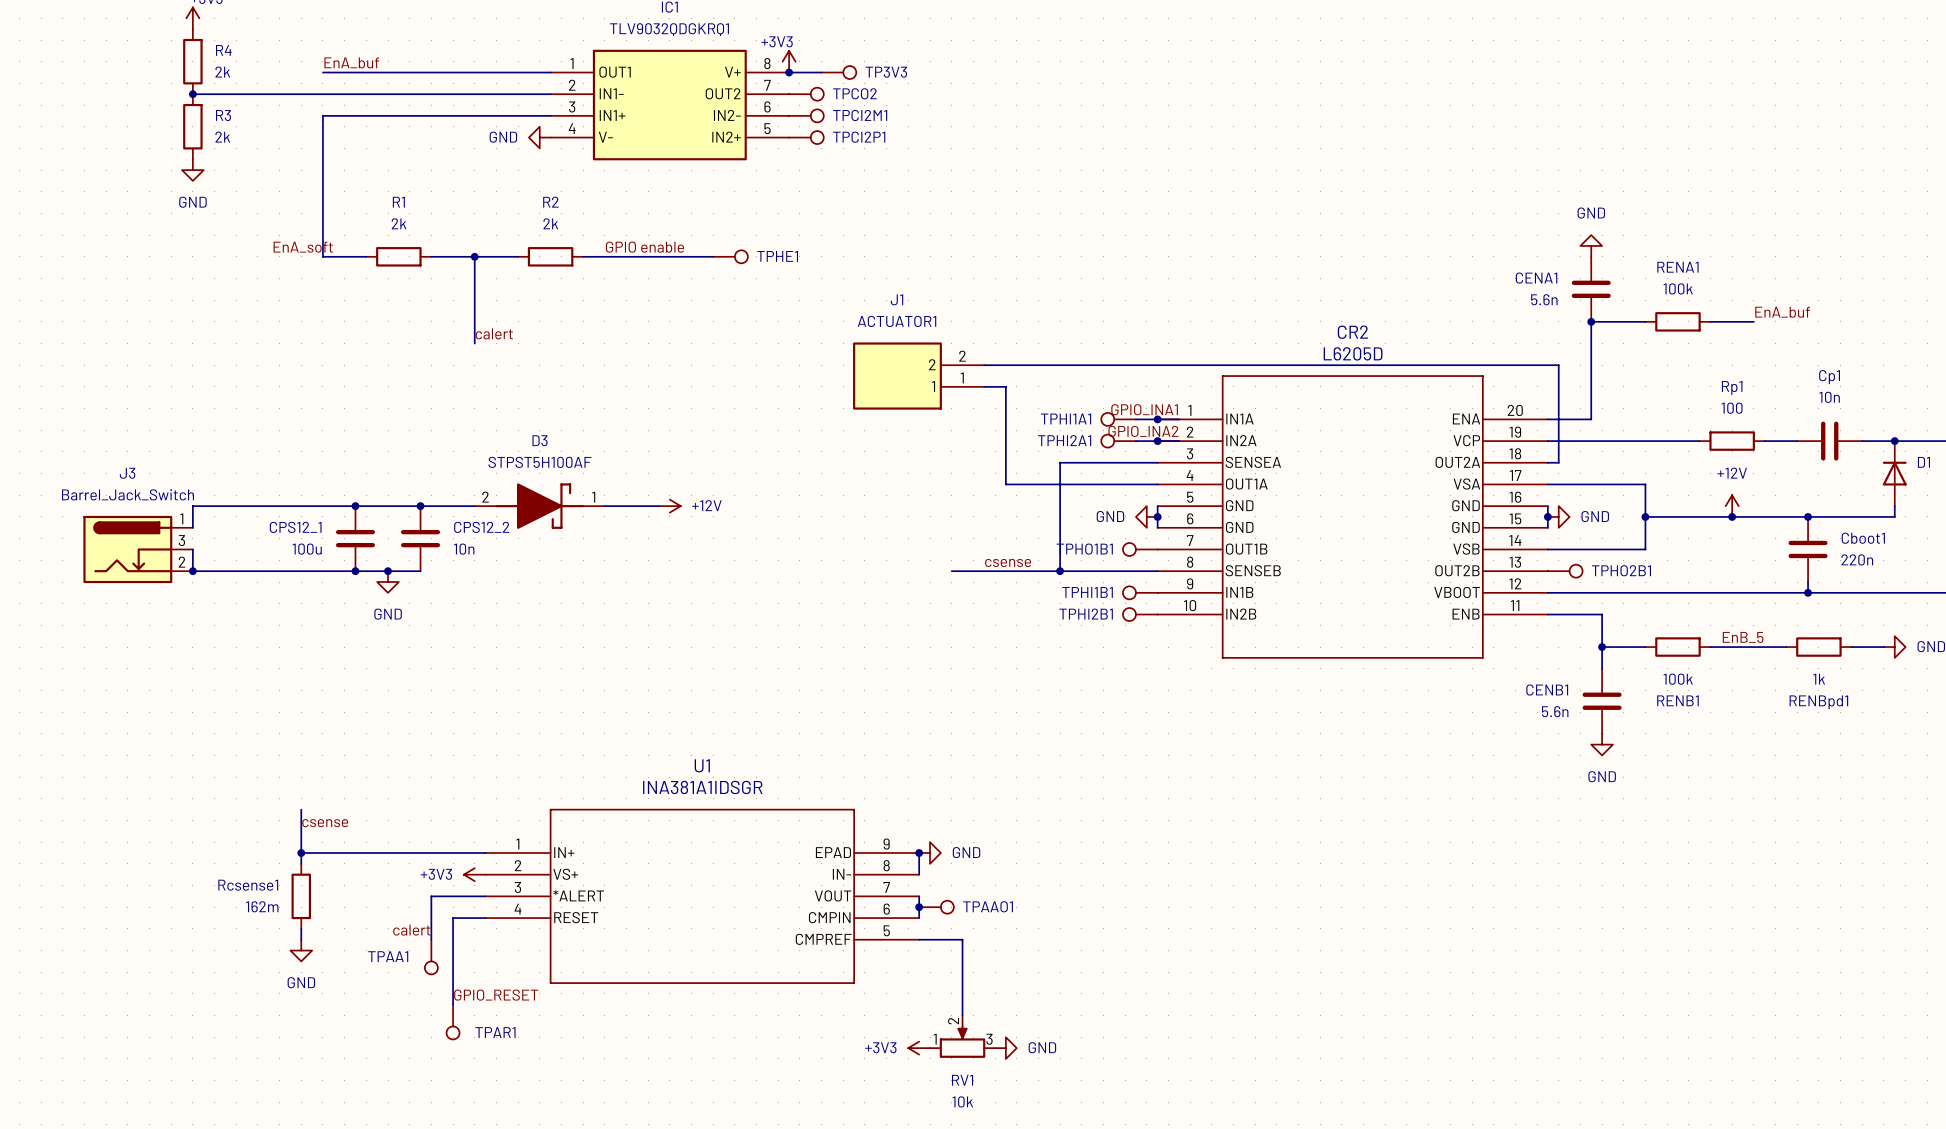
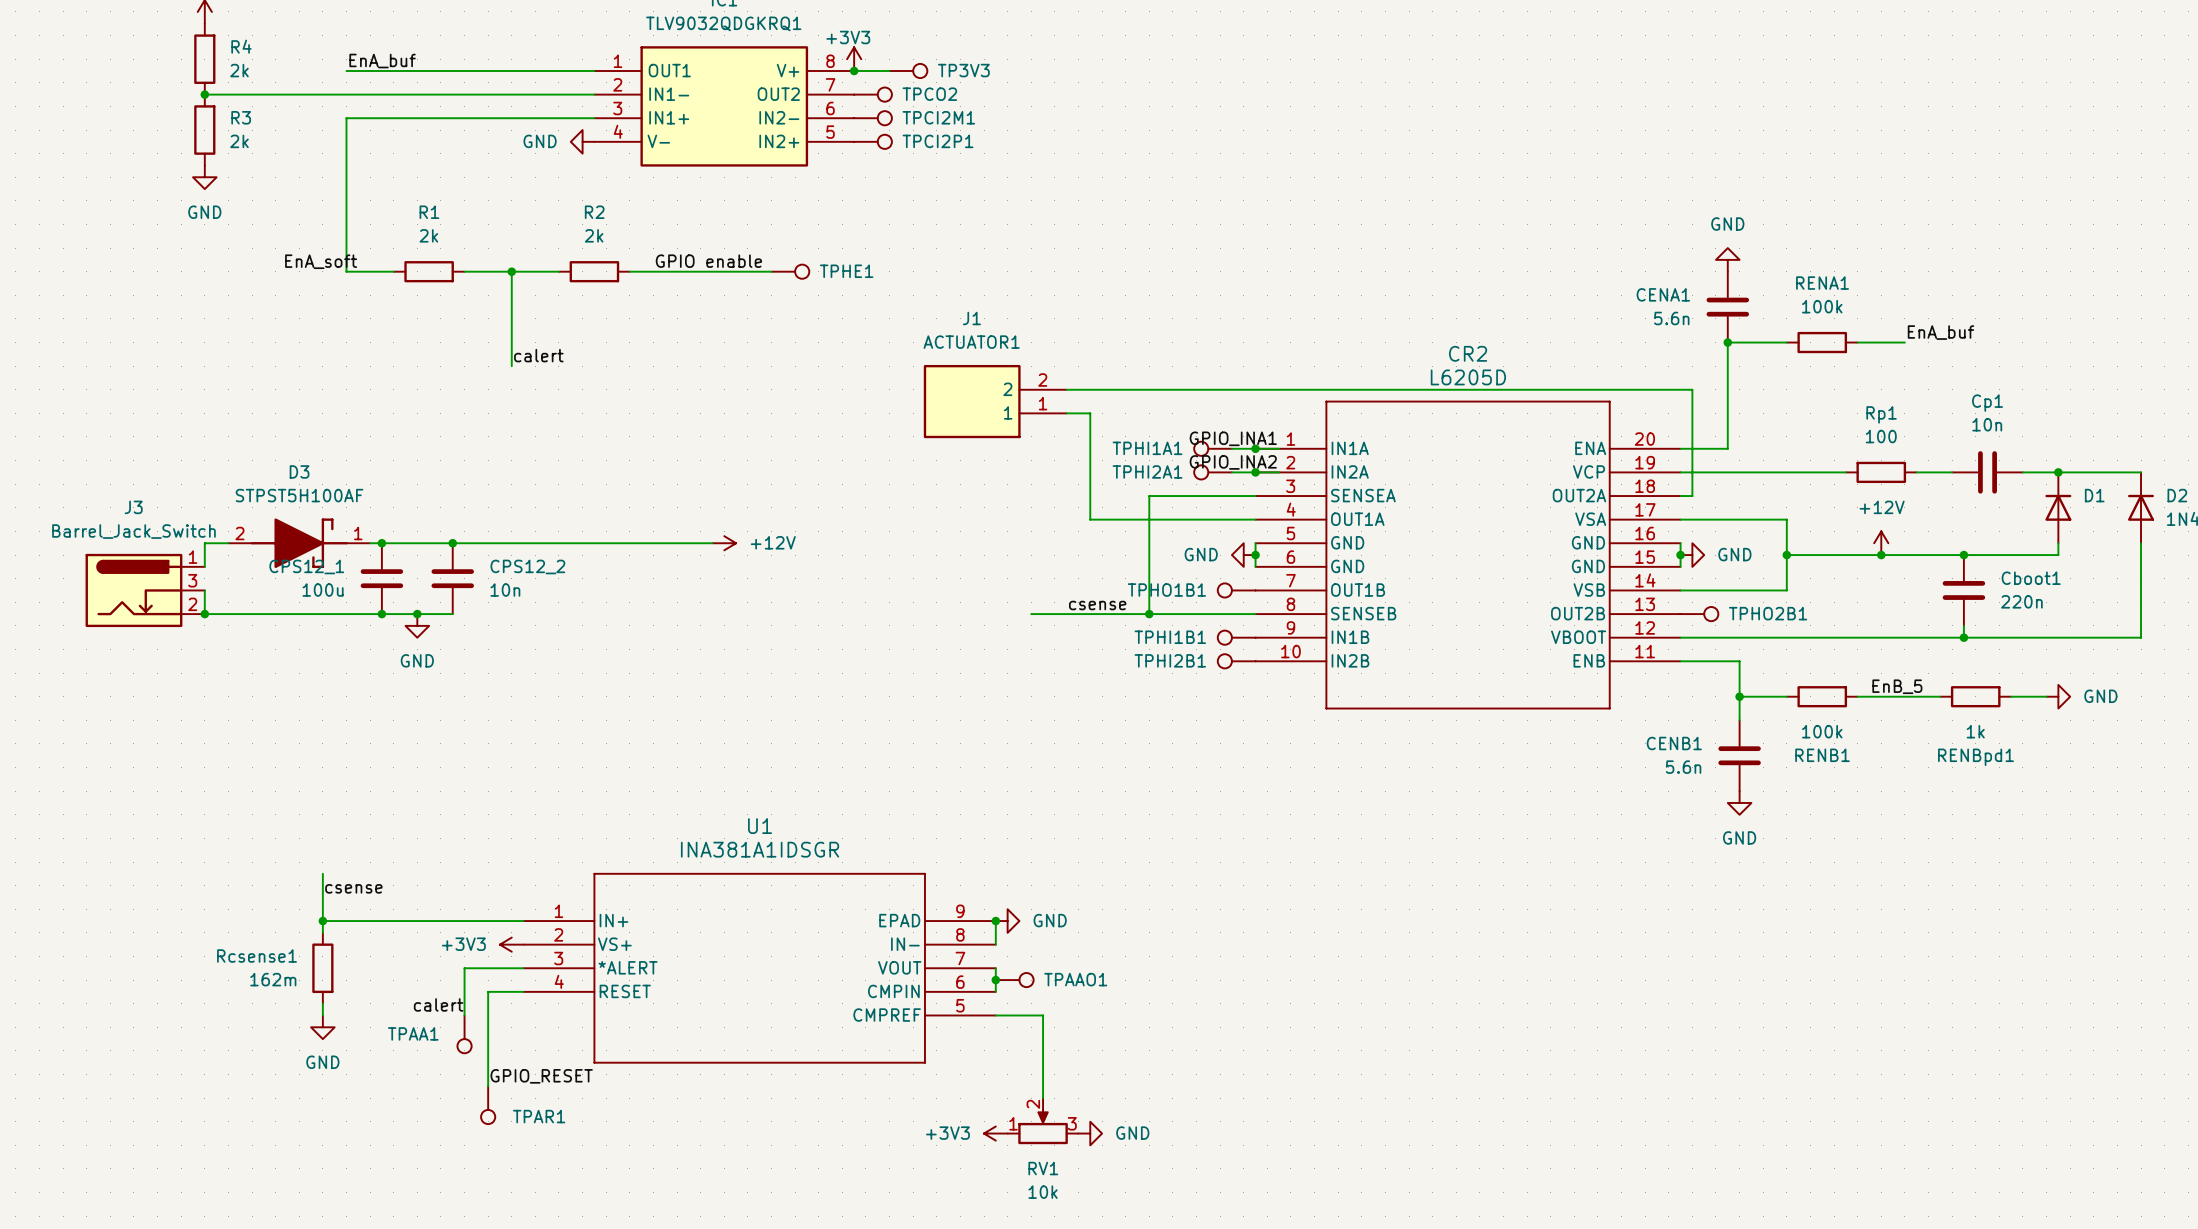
D3 position: (539, 506) -> (299, 543)

